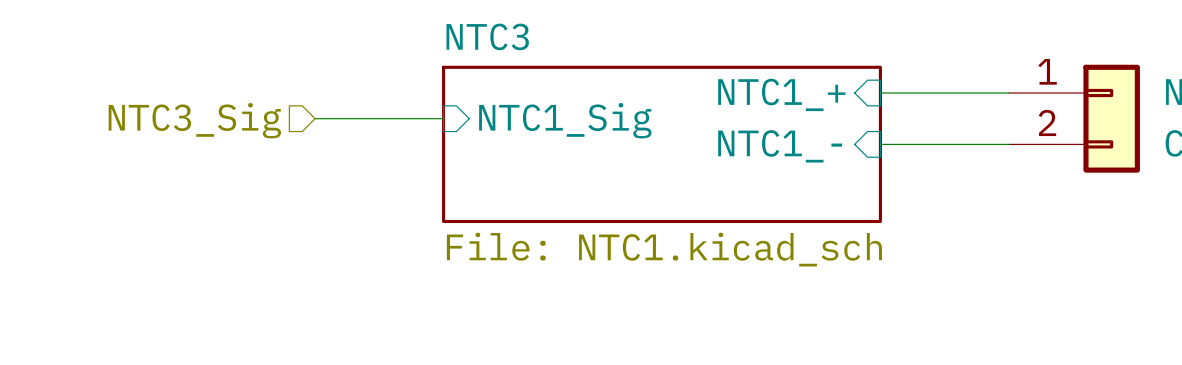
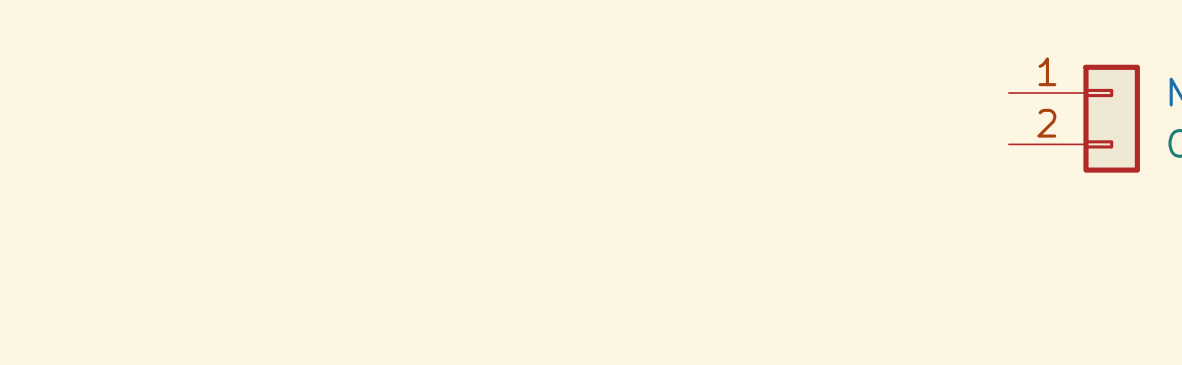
wire: (880, 93) (1008, 93) -> none
sheet pin: NTC1_+ (781, 94) -> none
wire: (315, 118) (443, 118) -> none
hierarchical label: NTC3_Sig (194, 120) -> none
sheet pin: NTC1_Sig (565, 120) -> none
sheet NTC3: File: NTC1.kicad_sch (661, 144) -> none
wire: (880, 144) (1008, 144) -> none
sheet pin: NTC1_- (780, 146) -> none

